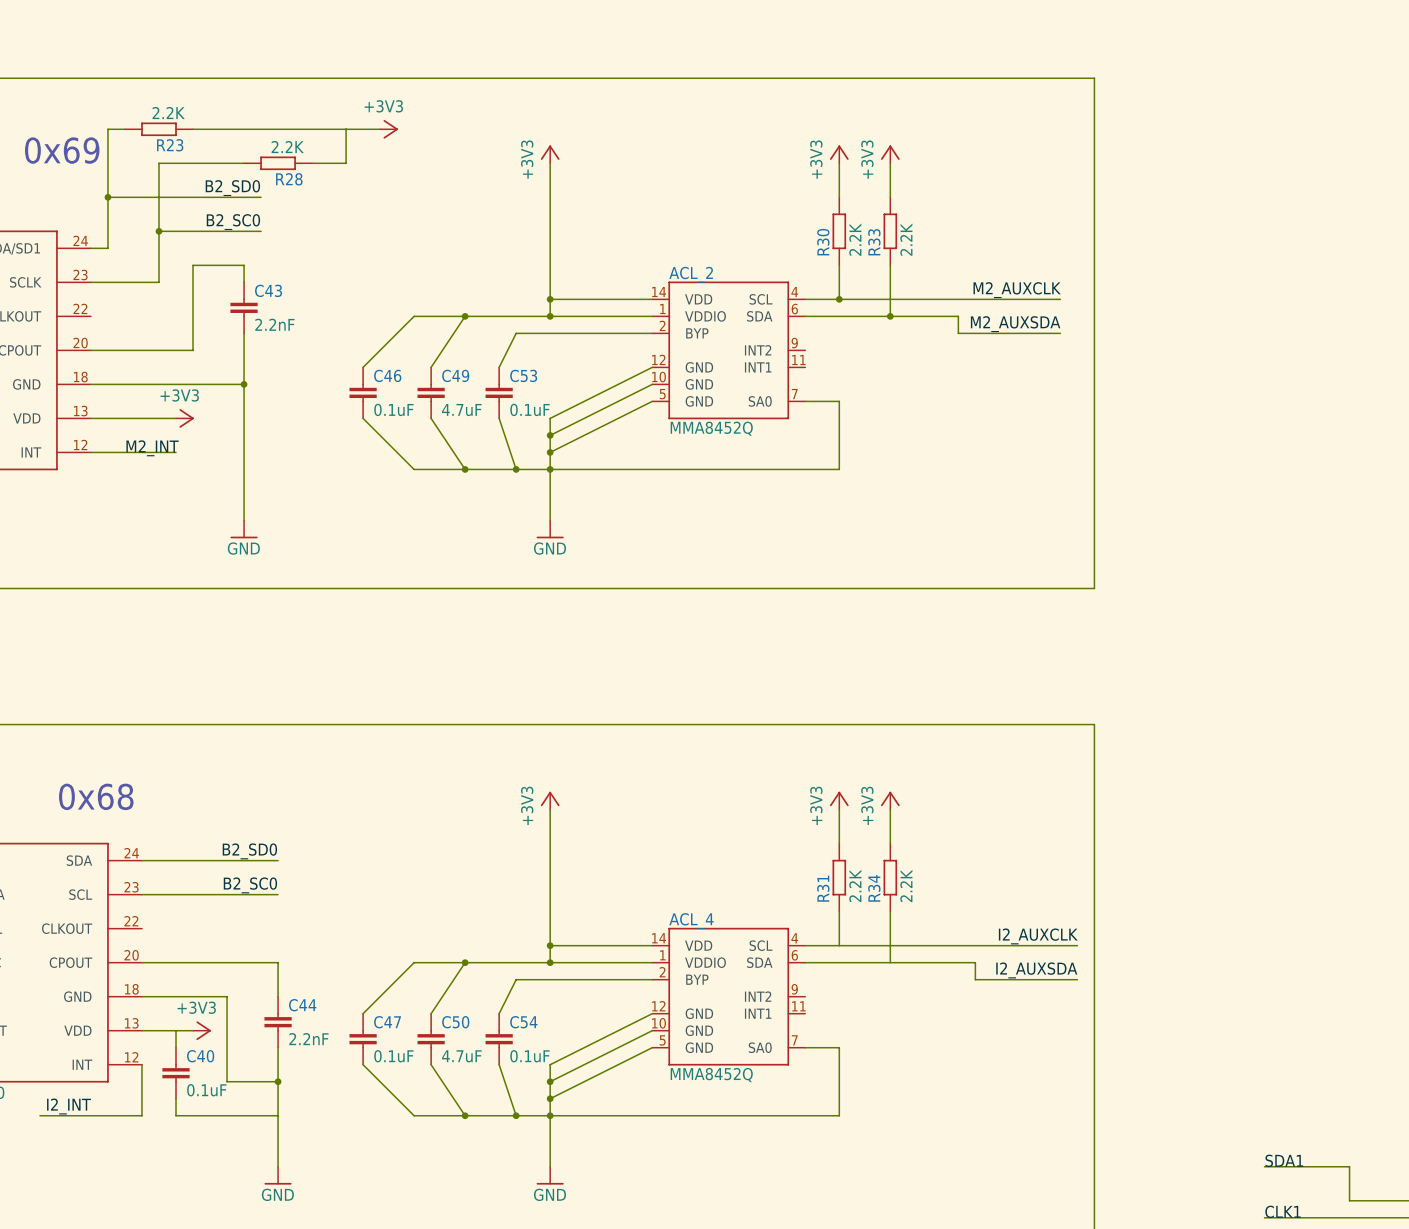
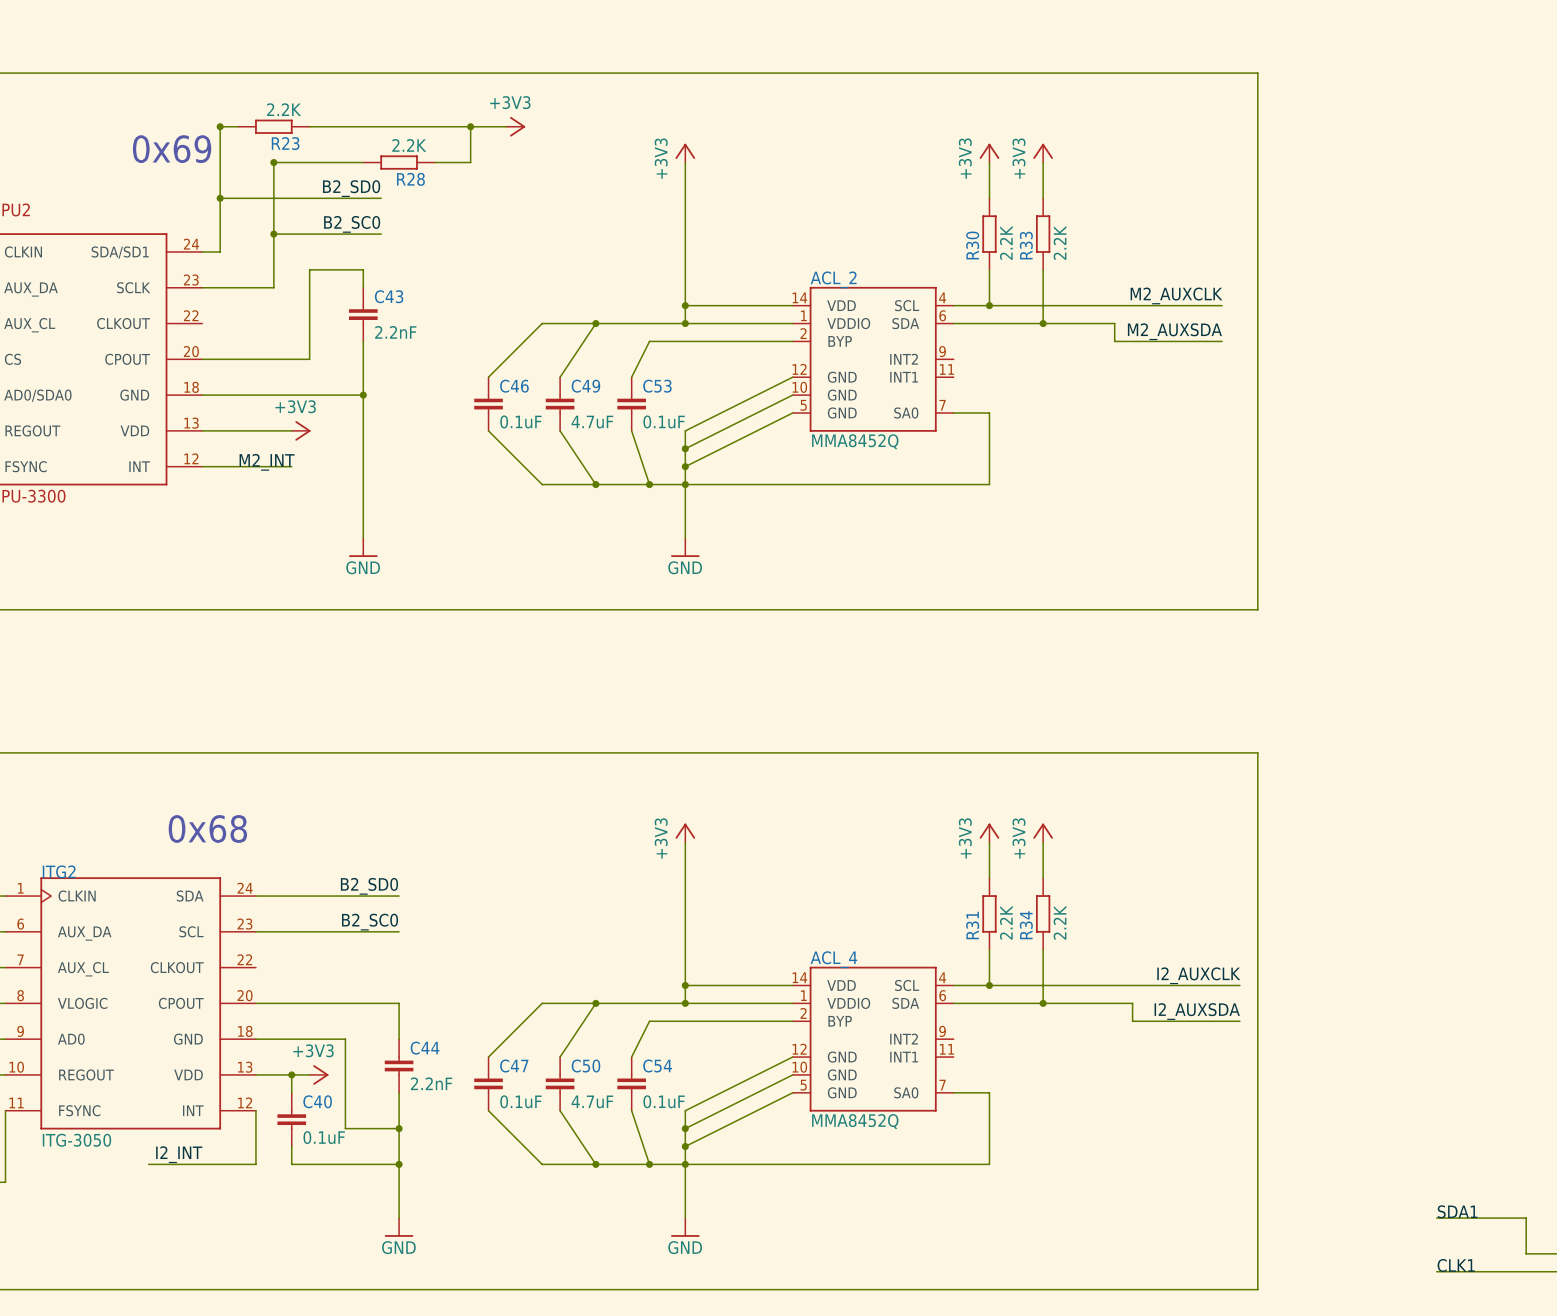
junction: none -> (220, 126)
junction: none -> (470, 126)
junction: none -> (273, 162)
junction: none -> (989, 985)
junction: none -> (1043, 1003)
junction: none -> (291, 1074)
junction: none -> (399, 1164)

